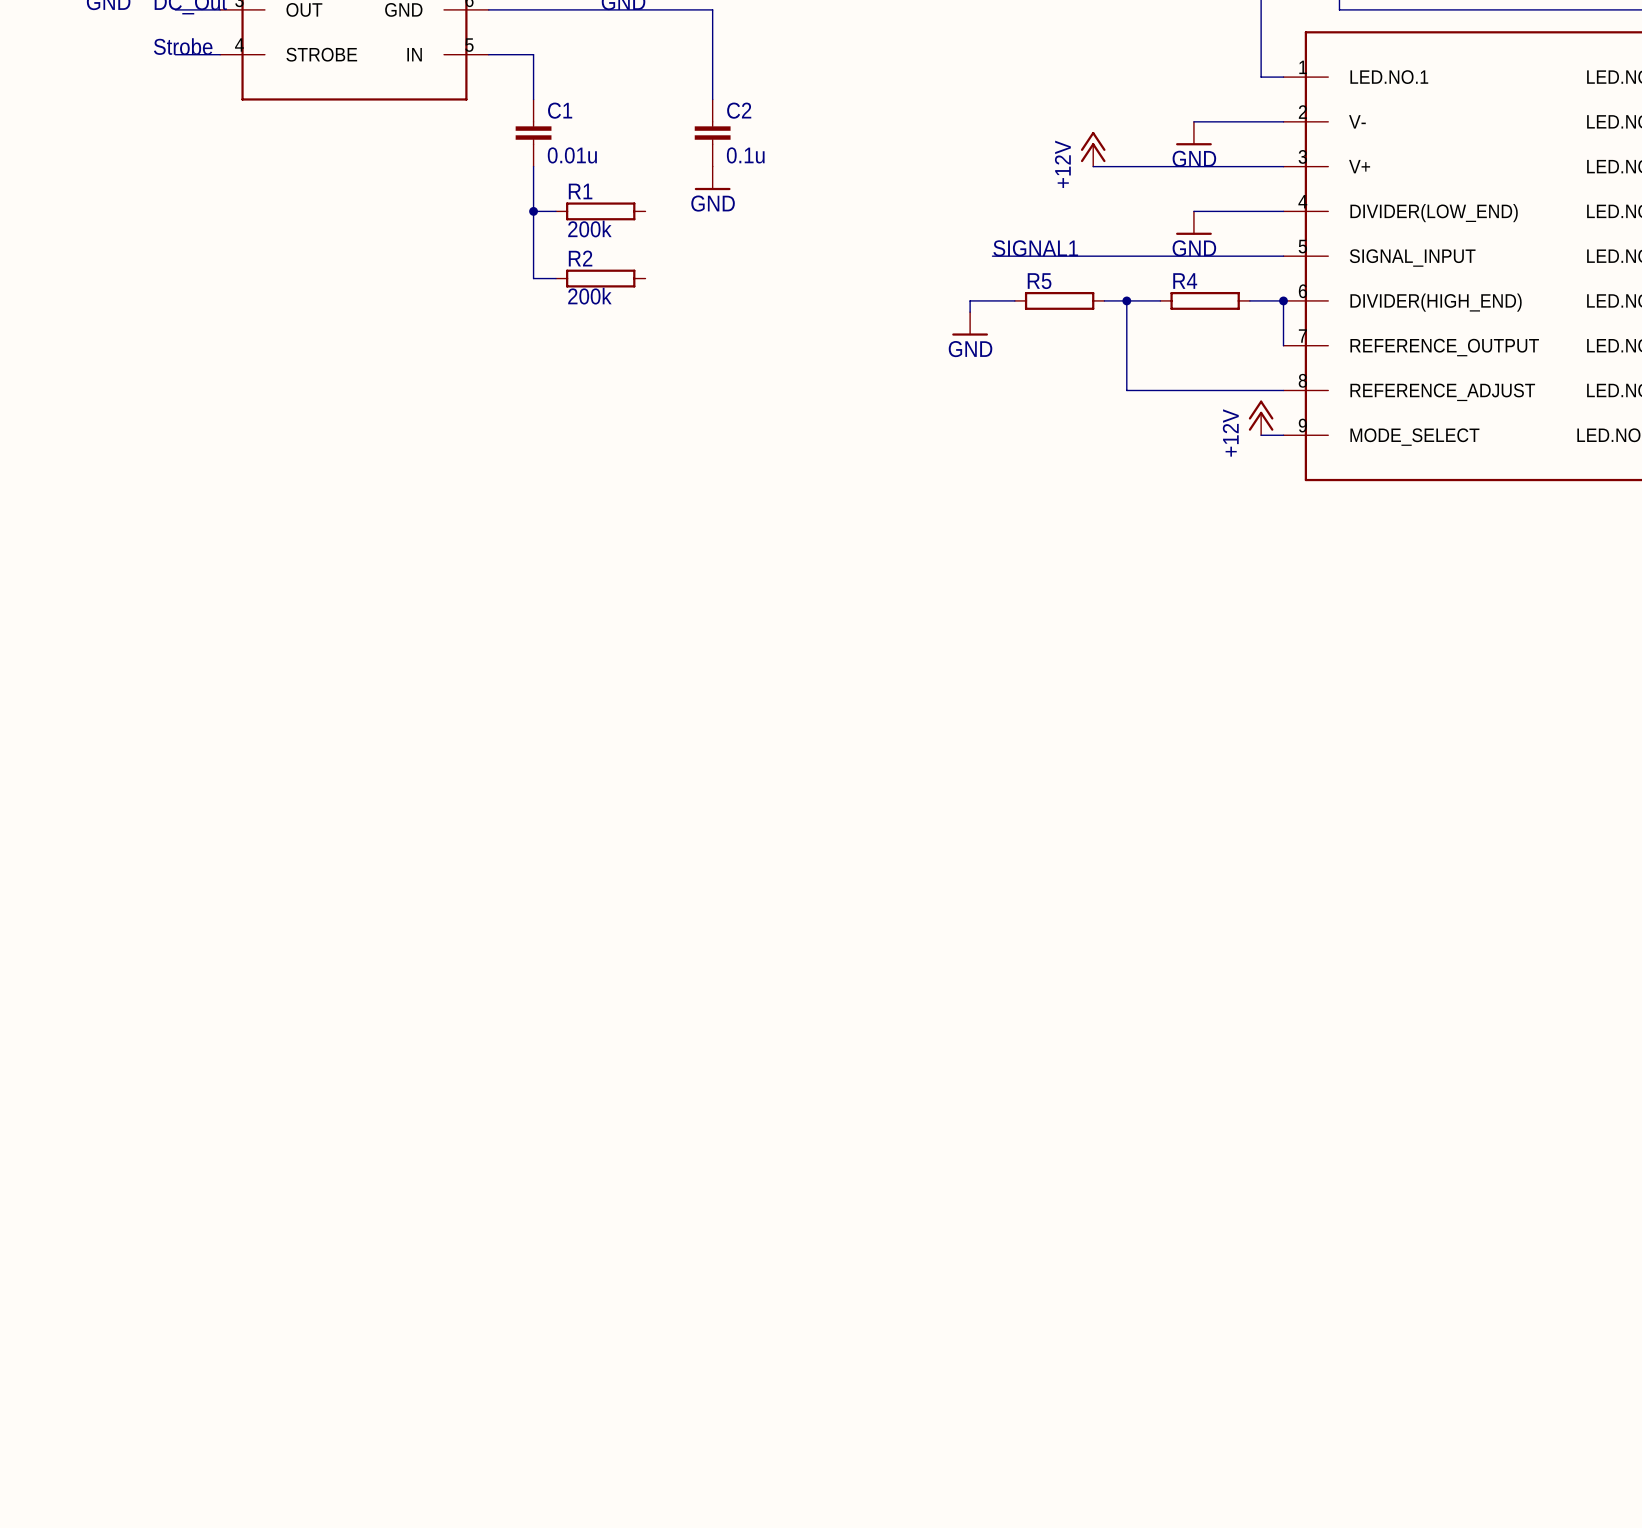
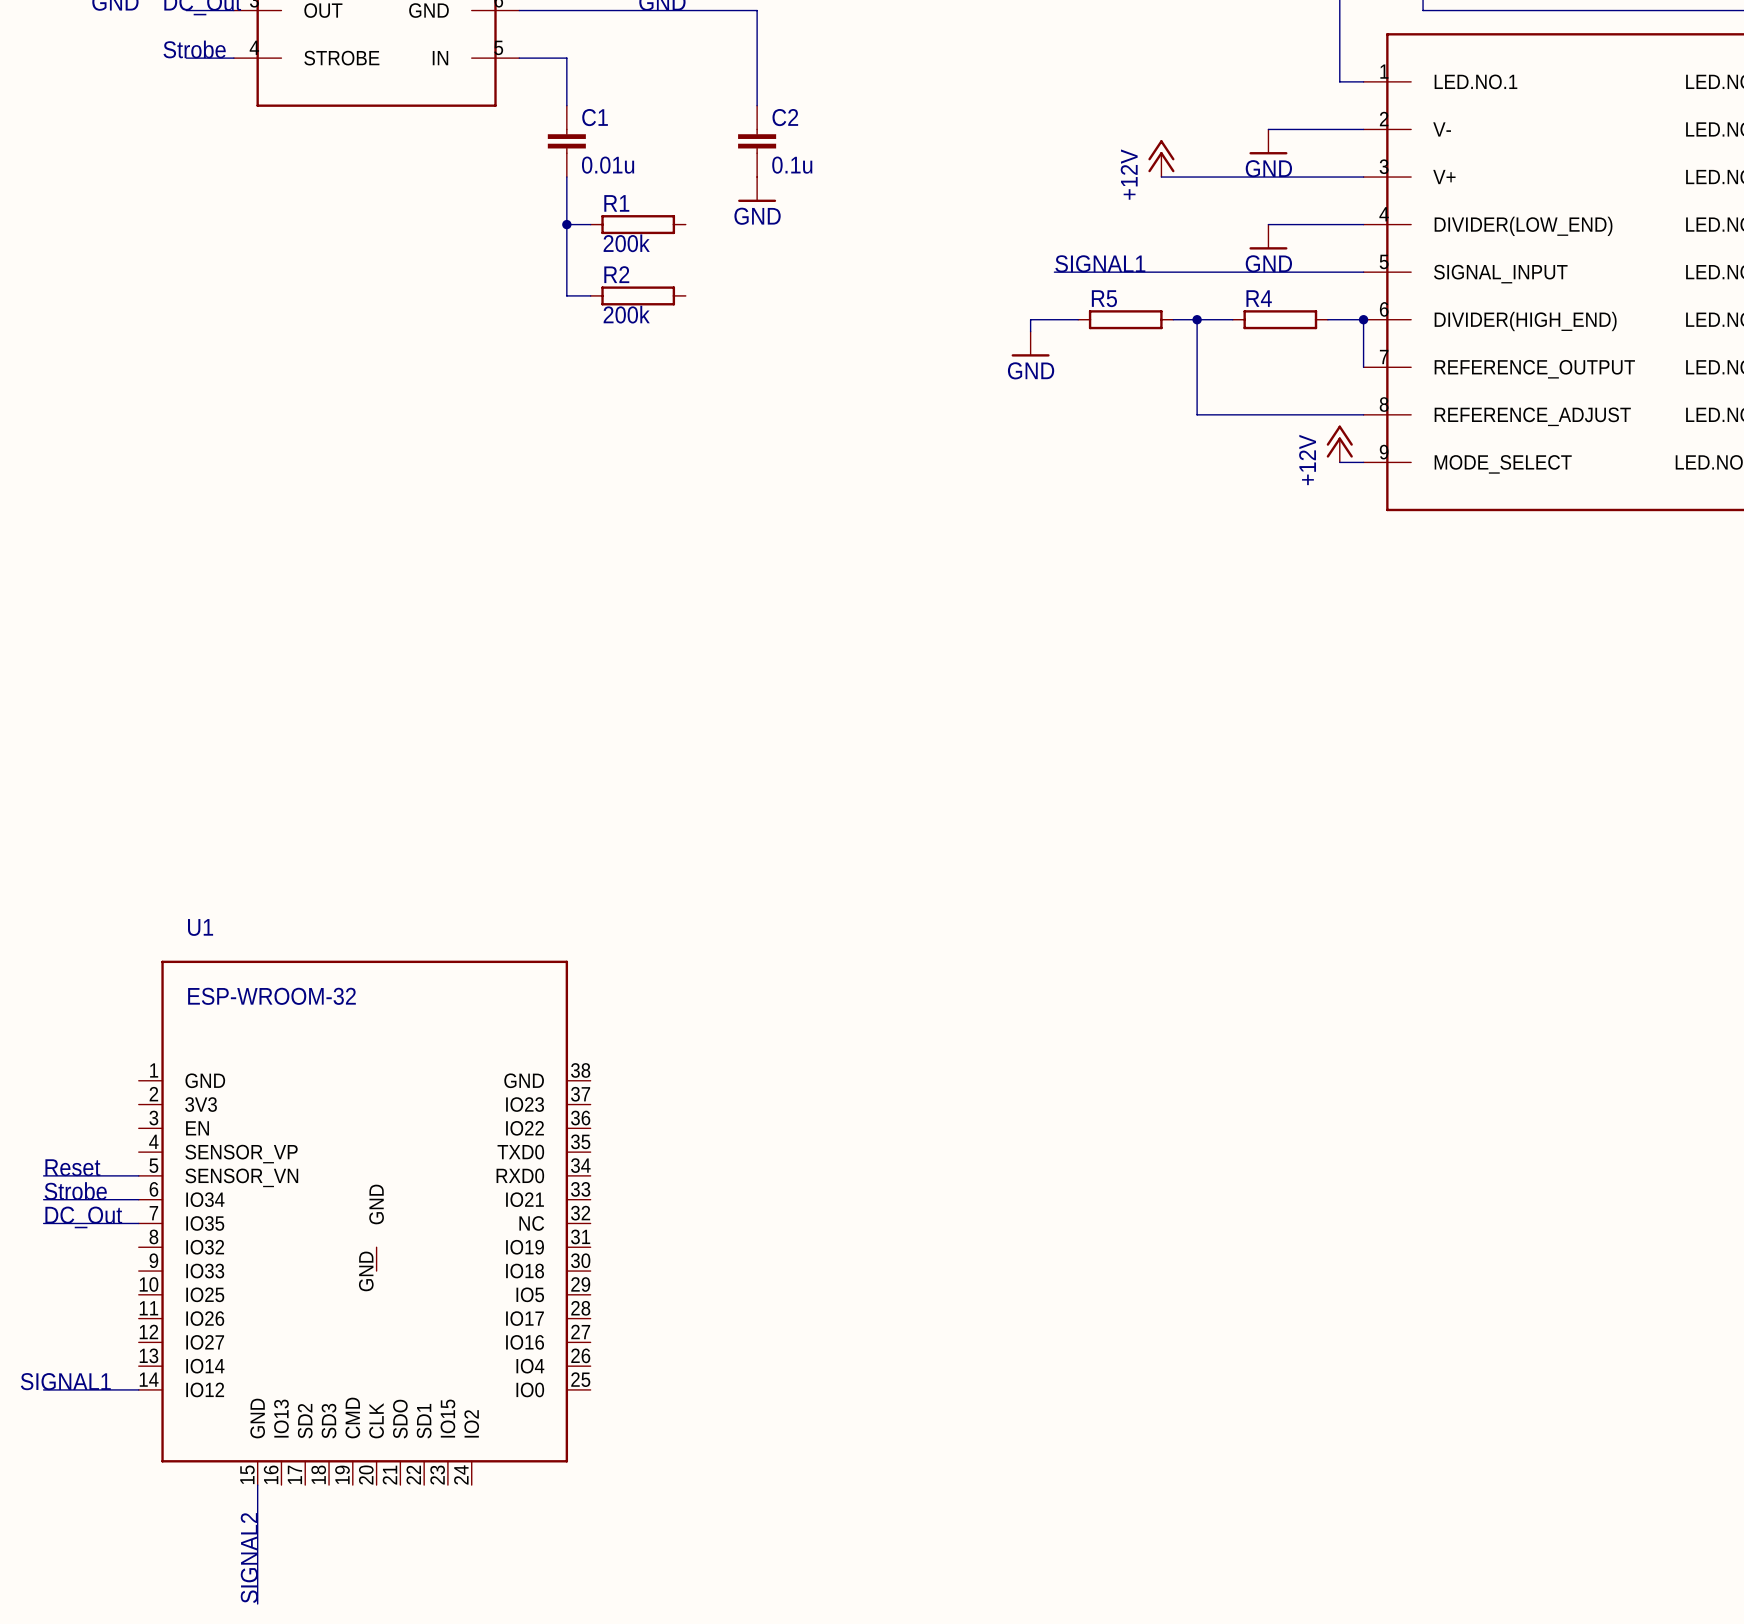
text: none -> Reset (72, 1167)
wire: none -> (43, 1175) (138, 1175)
text: none -> Strobe (75, 1191)
wire: none -> (43, 1199) (138, 1199)
text: none -> DC_Out (83, 1217)
wire: none -> (43, 1223) (138, 1223)
U1: none -> ESP-WROOM-32 (364, 1222)
text: none -> SIGNAL1 (65, 1381)
wire: none -> (43, 1389) (138, 1389)
wire: none -> (257, 1485) (257, 1603)
text: none -> SIGNAL2 (249, 1558)

